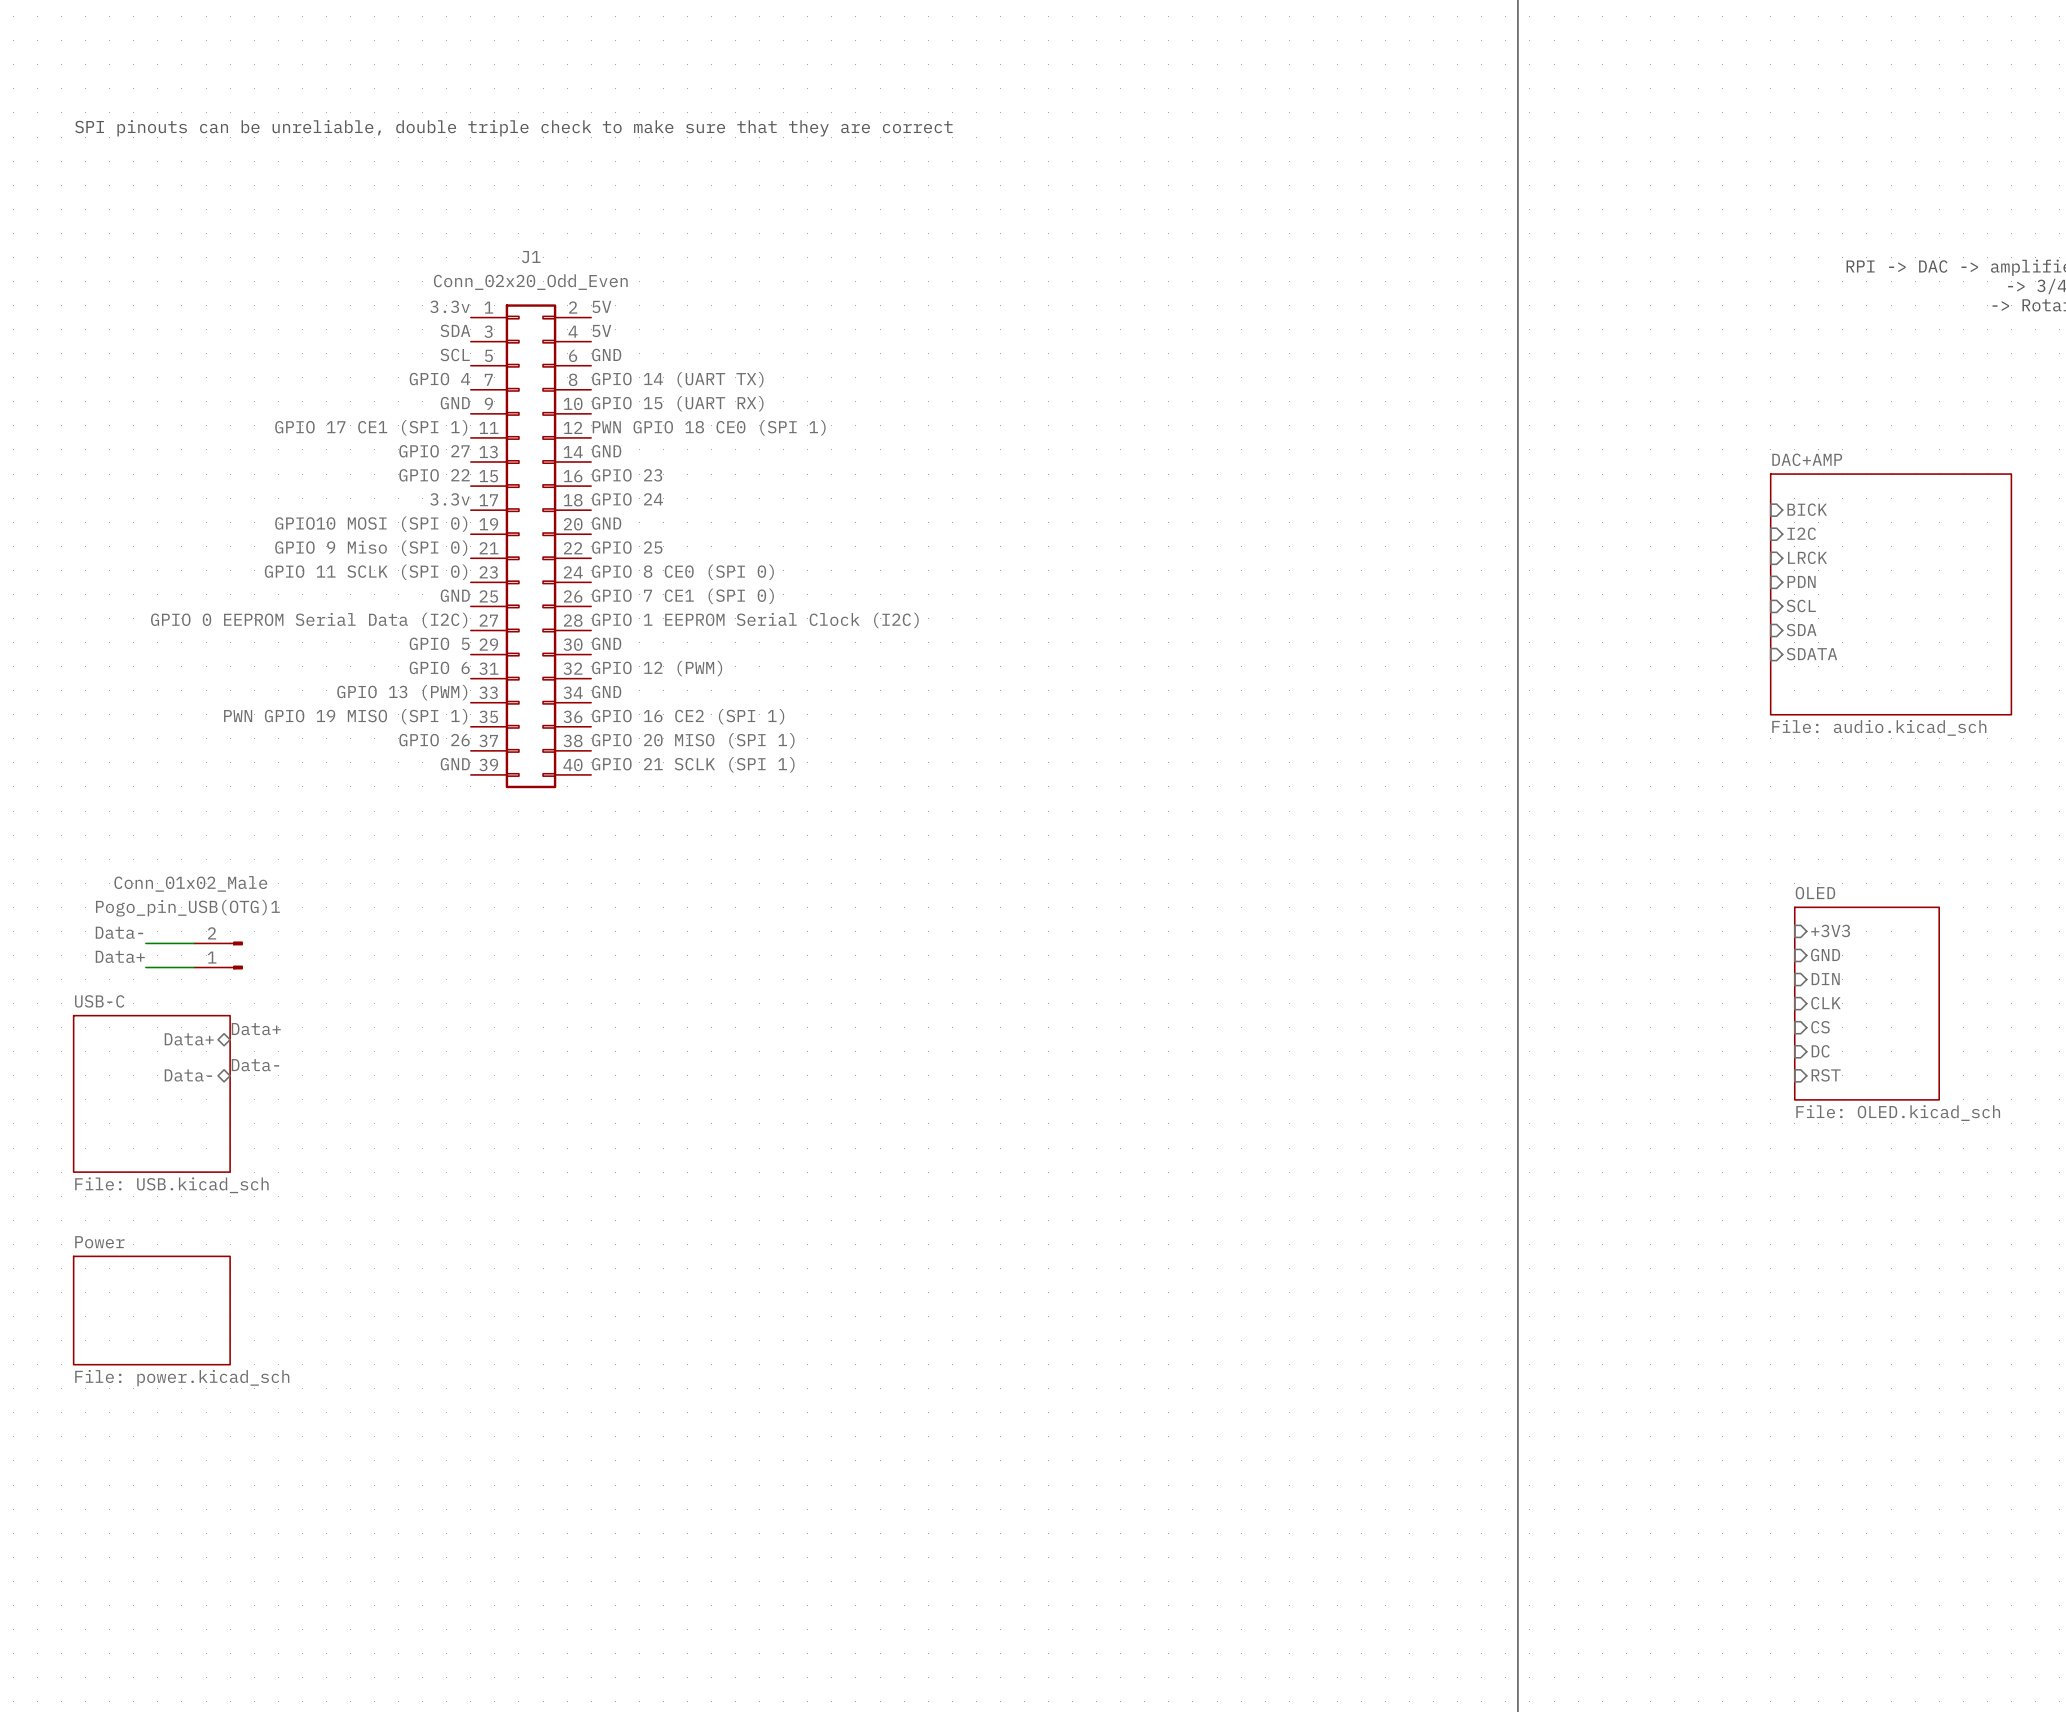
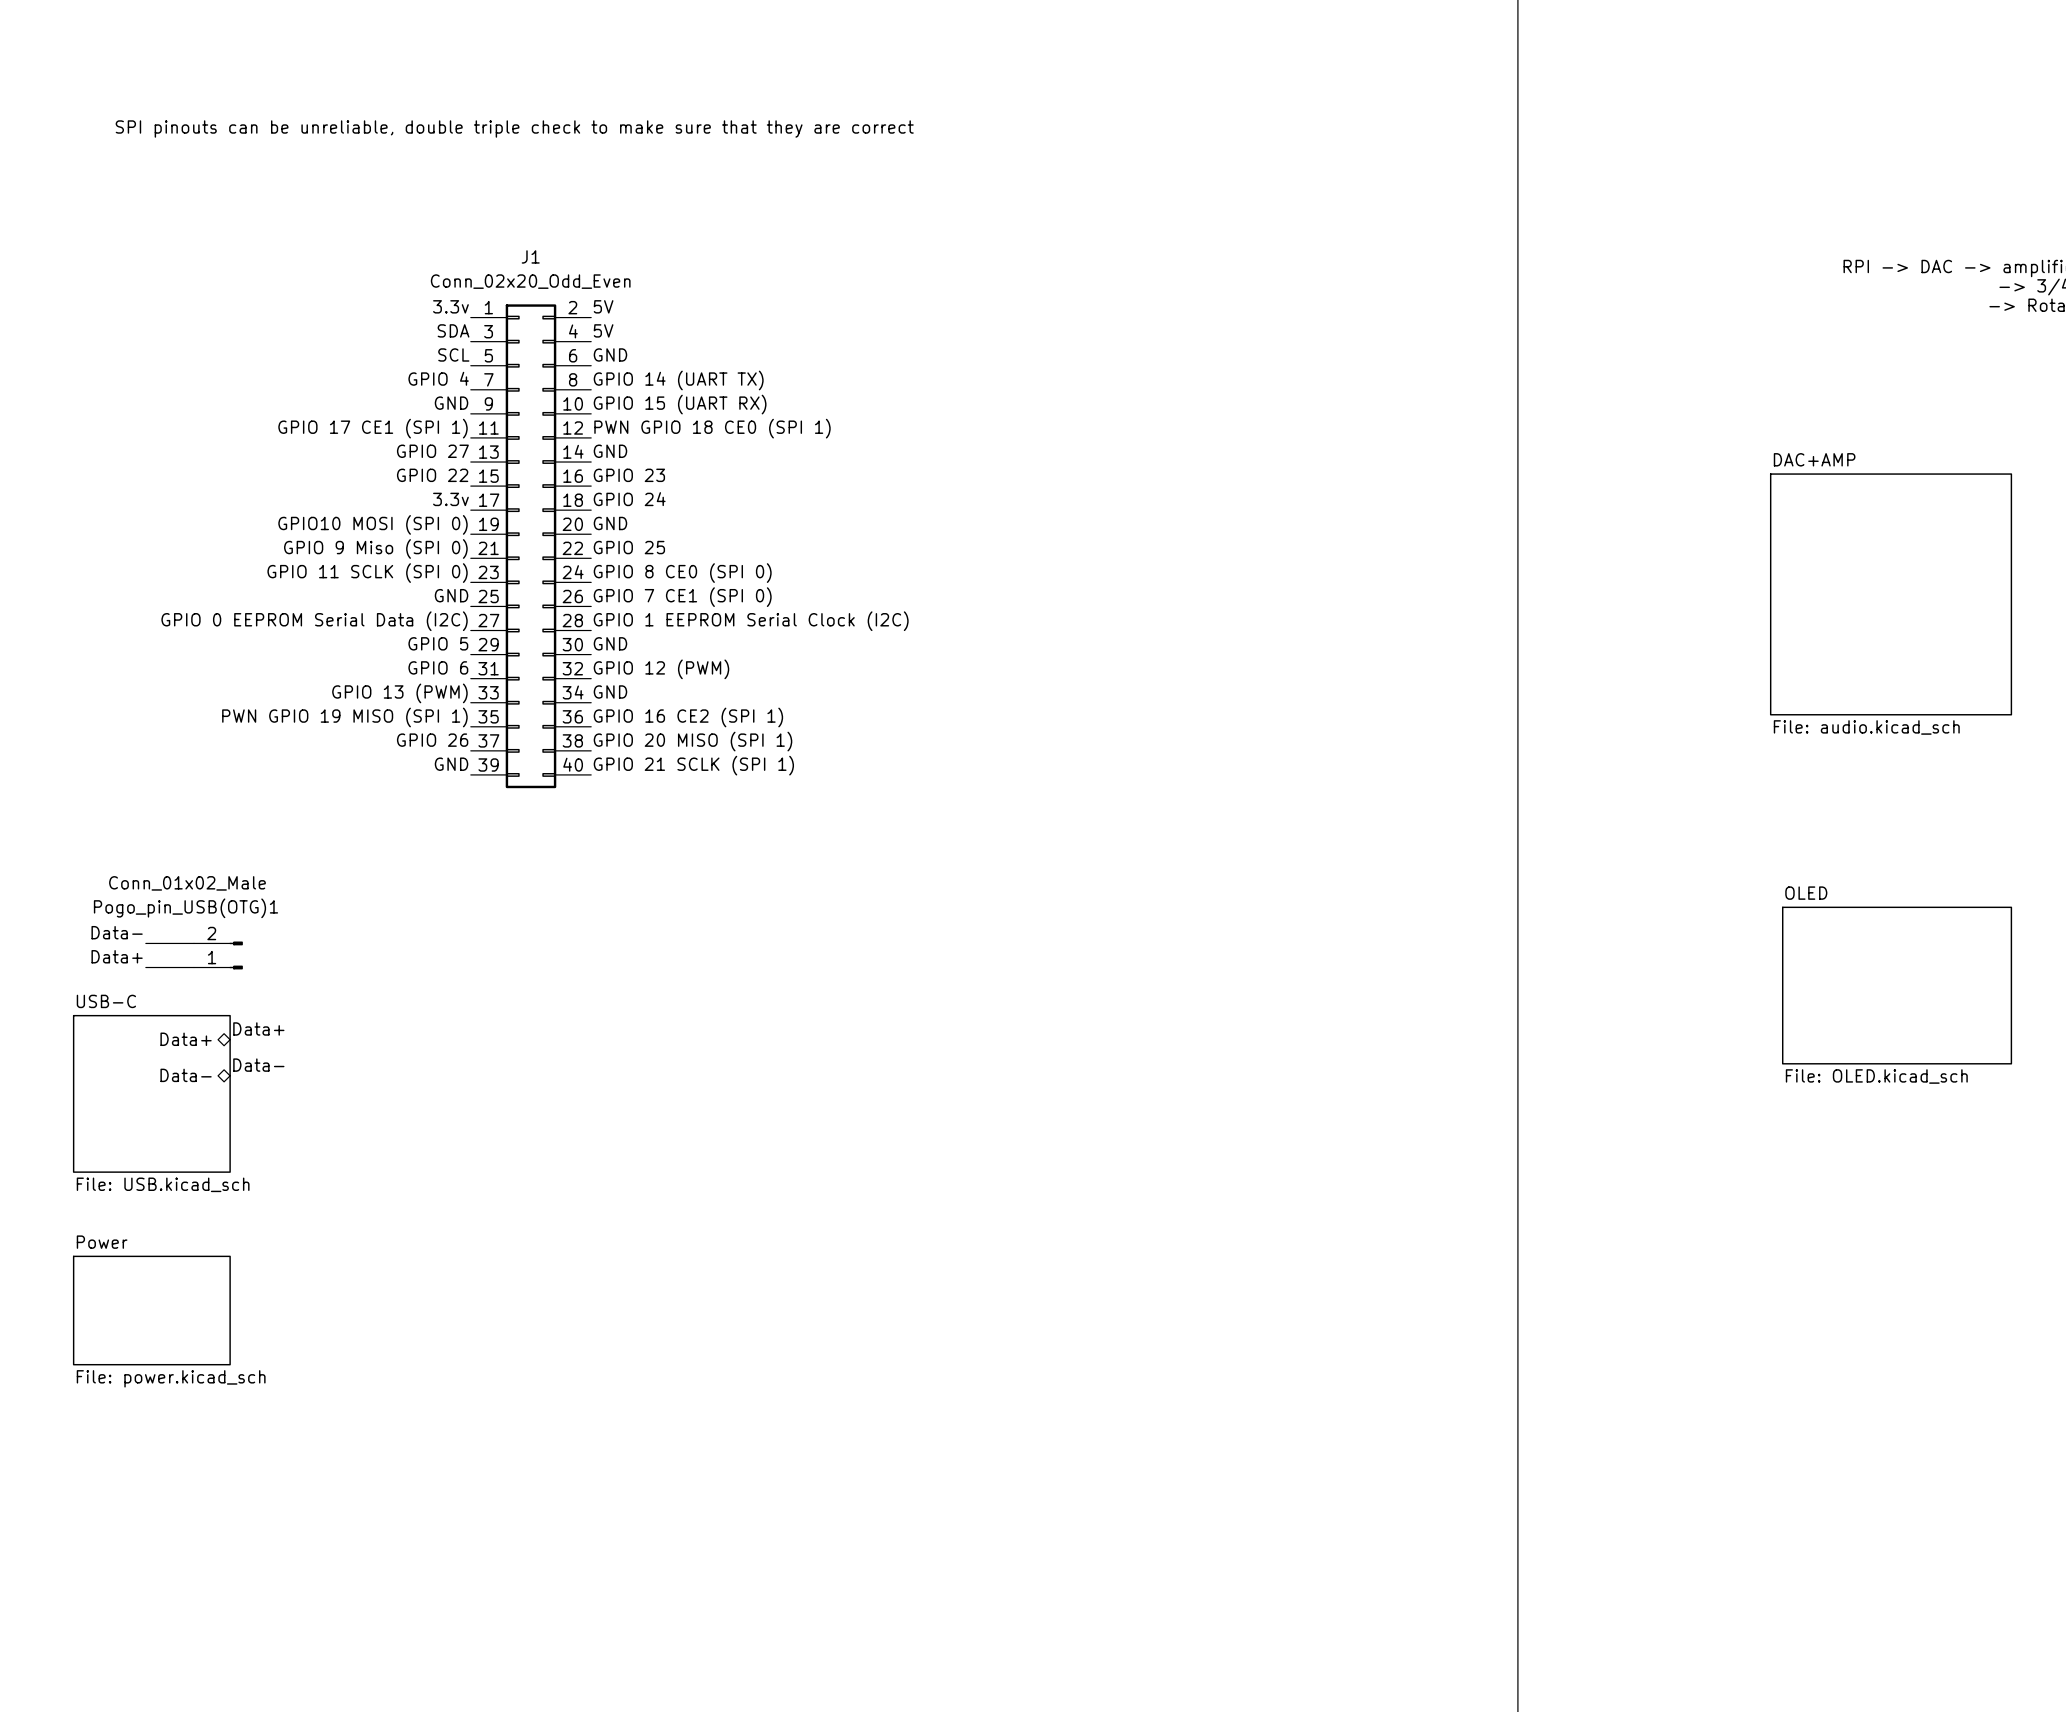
sheet pin: BICK (1807, 509) -> none
sheet pin: I2C (1801, 533) -> none
sheet pin: LRCK (1807, 557) -> none
sheet pin: PDN (1801, 581) -> none
sheet pin: SCL (1801, 605) -> none
sheet pin: SDA (1801, 630) -> none
sheet pin: SDATA (1811, 654) -> none
sheet pin: +3V3 (1830, 930) -> none
sheet pin: GND (1825, 955) -> none
sheet pin: DIN (1825, 979) -> none
sheet OLED: none -> File: OLED.kicad_sch (1897, 985)
sheet pin: CLK (1825, 1003) -> none
sheet OLED: File: OLED.kicad_sch (1866, 1003) -> none
sheet pin: CS (1820, 1027) -> none
sheet pin: DC (1820, 1051) -> none
sheet pin: RST (1826, 1075) -> none

